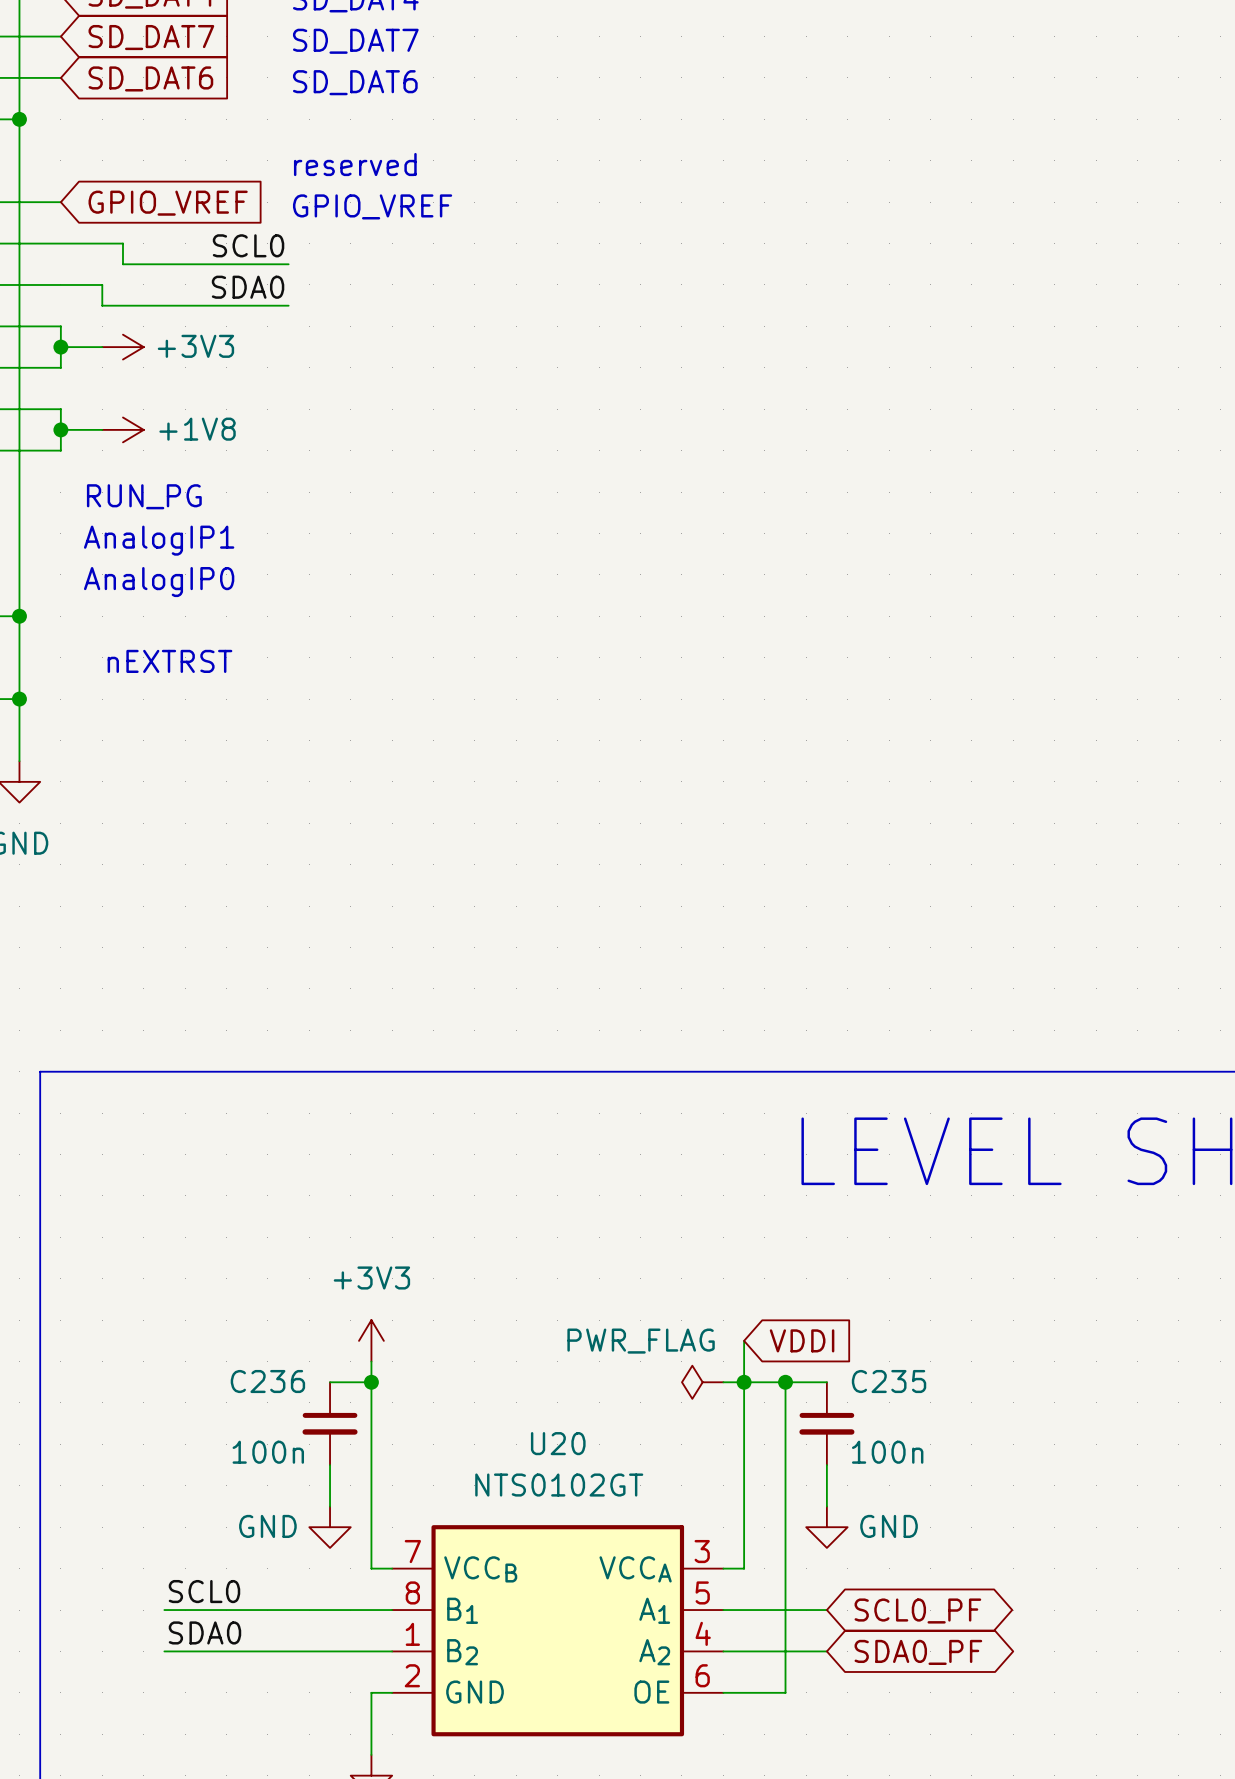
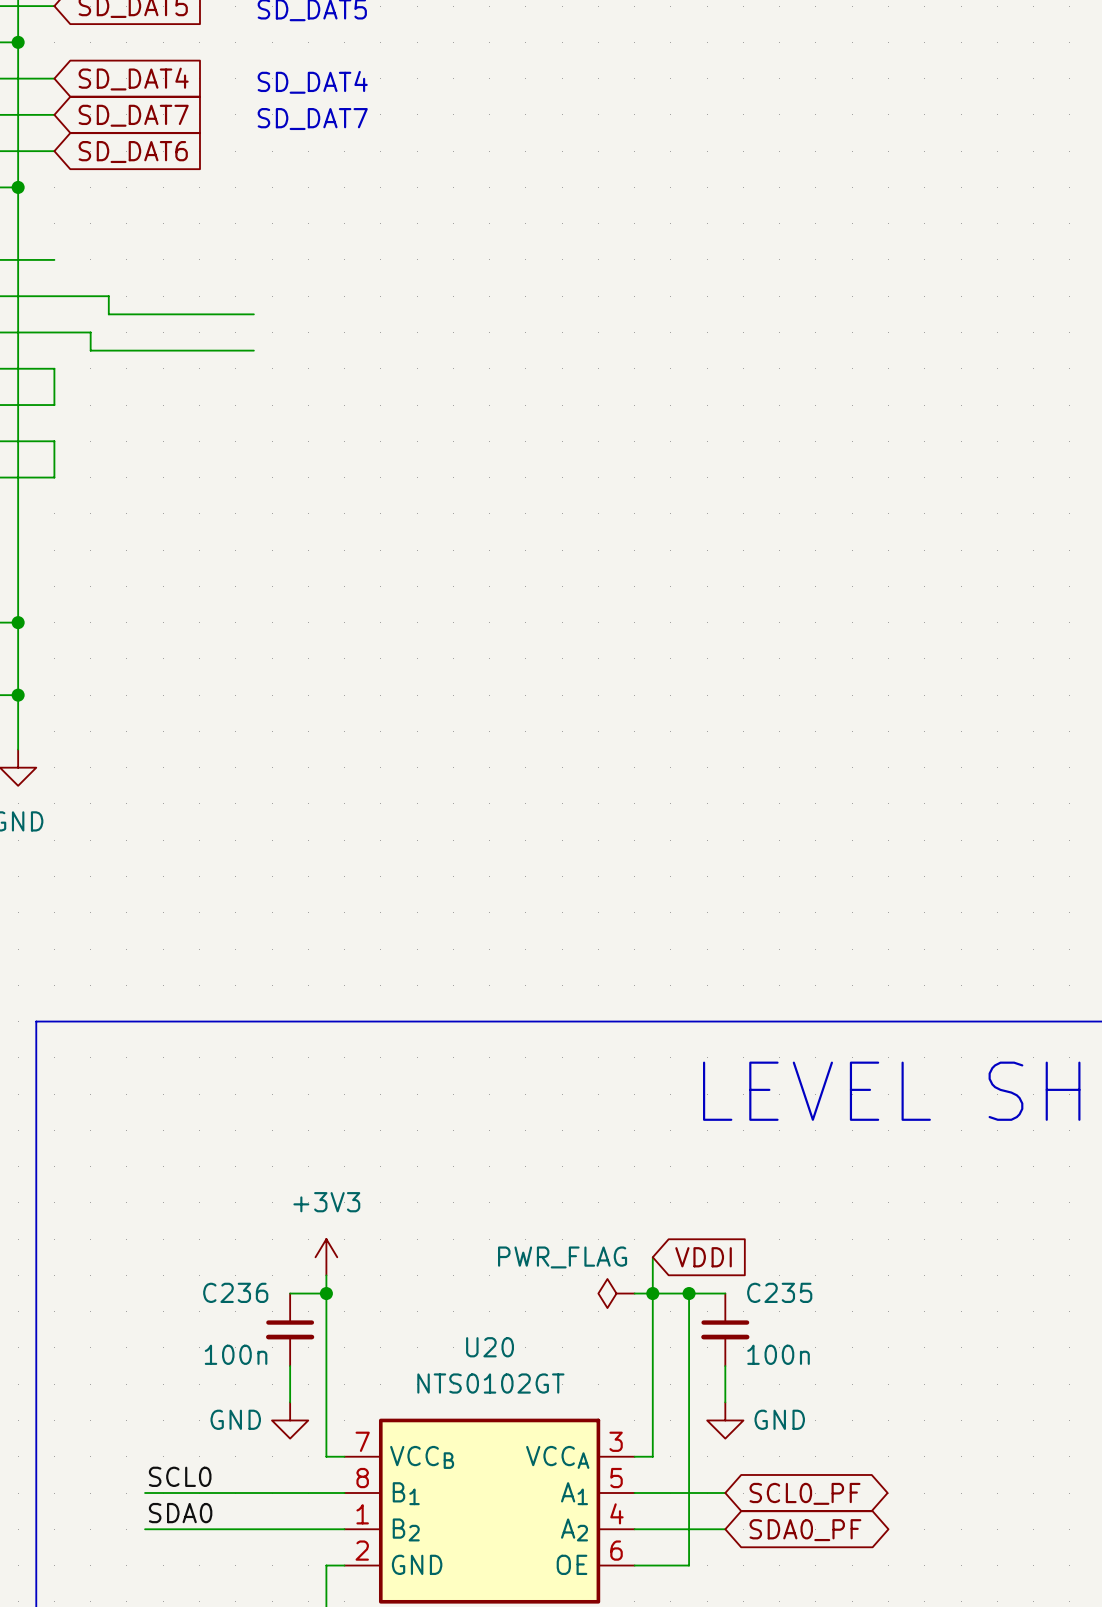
text: SD_DAT6 (355, 82) -> none
text: reserved (355, 164) -> none
global label: GPIO_VREF (168, 203) -> none
text: GPIO_VREF (372, 206) -> none
label: SCL0 (248, 245) -> none
label: SDA0 (248, 287) -> none
wire: (60, 347) (102, 347) -> none
junction: (60, 347) -> none
power symbol: +3V3 (122, 347) -> none
wire: (60, 429) (102, 429) -> none
junction: (60, 429) -> none
power symbol: +1V8 (122, 429) -> none
text: RUN_PG (144, 496) -> none
text: AnalogIP1 (159, 540) -> none
text: AnalogIP0 (159, 582) -> none
text: nEXTRST (169, 661) -> none

